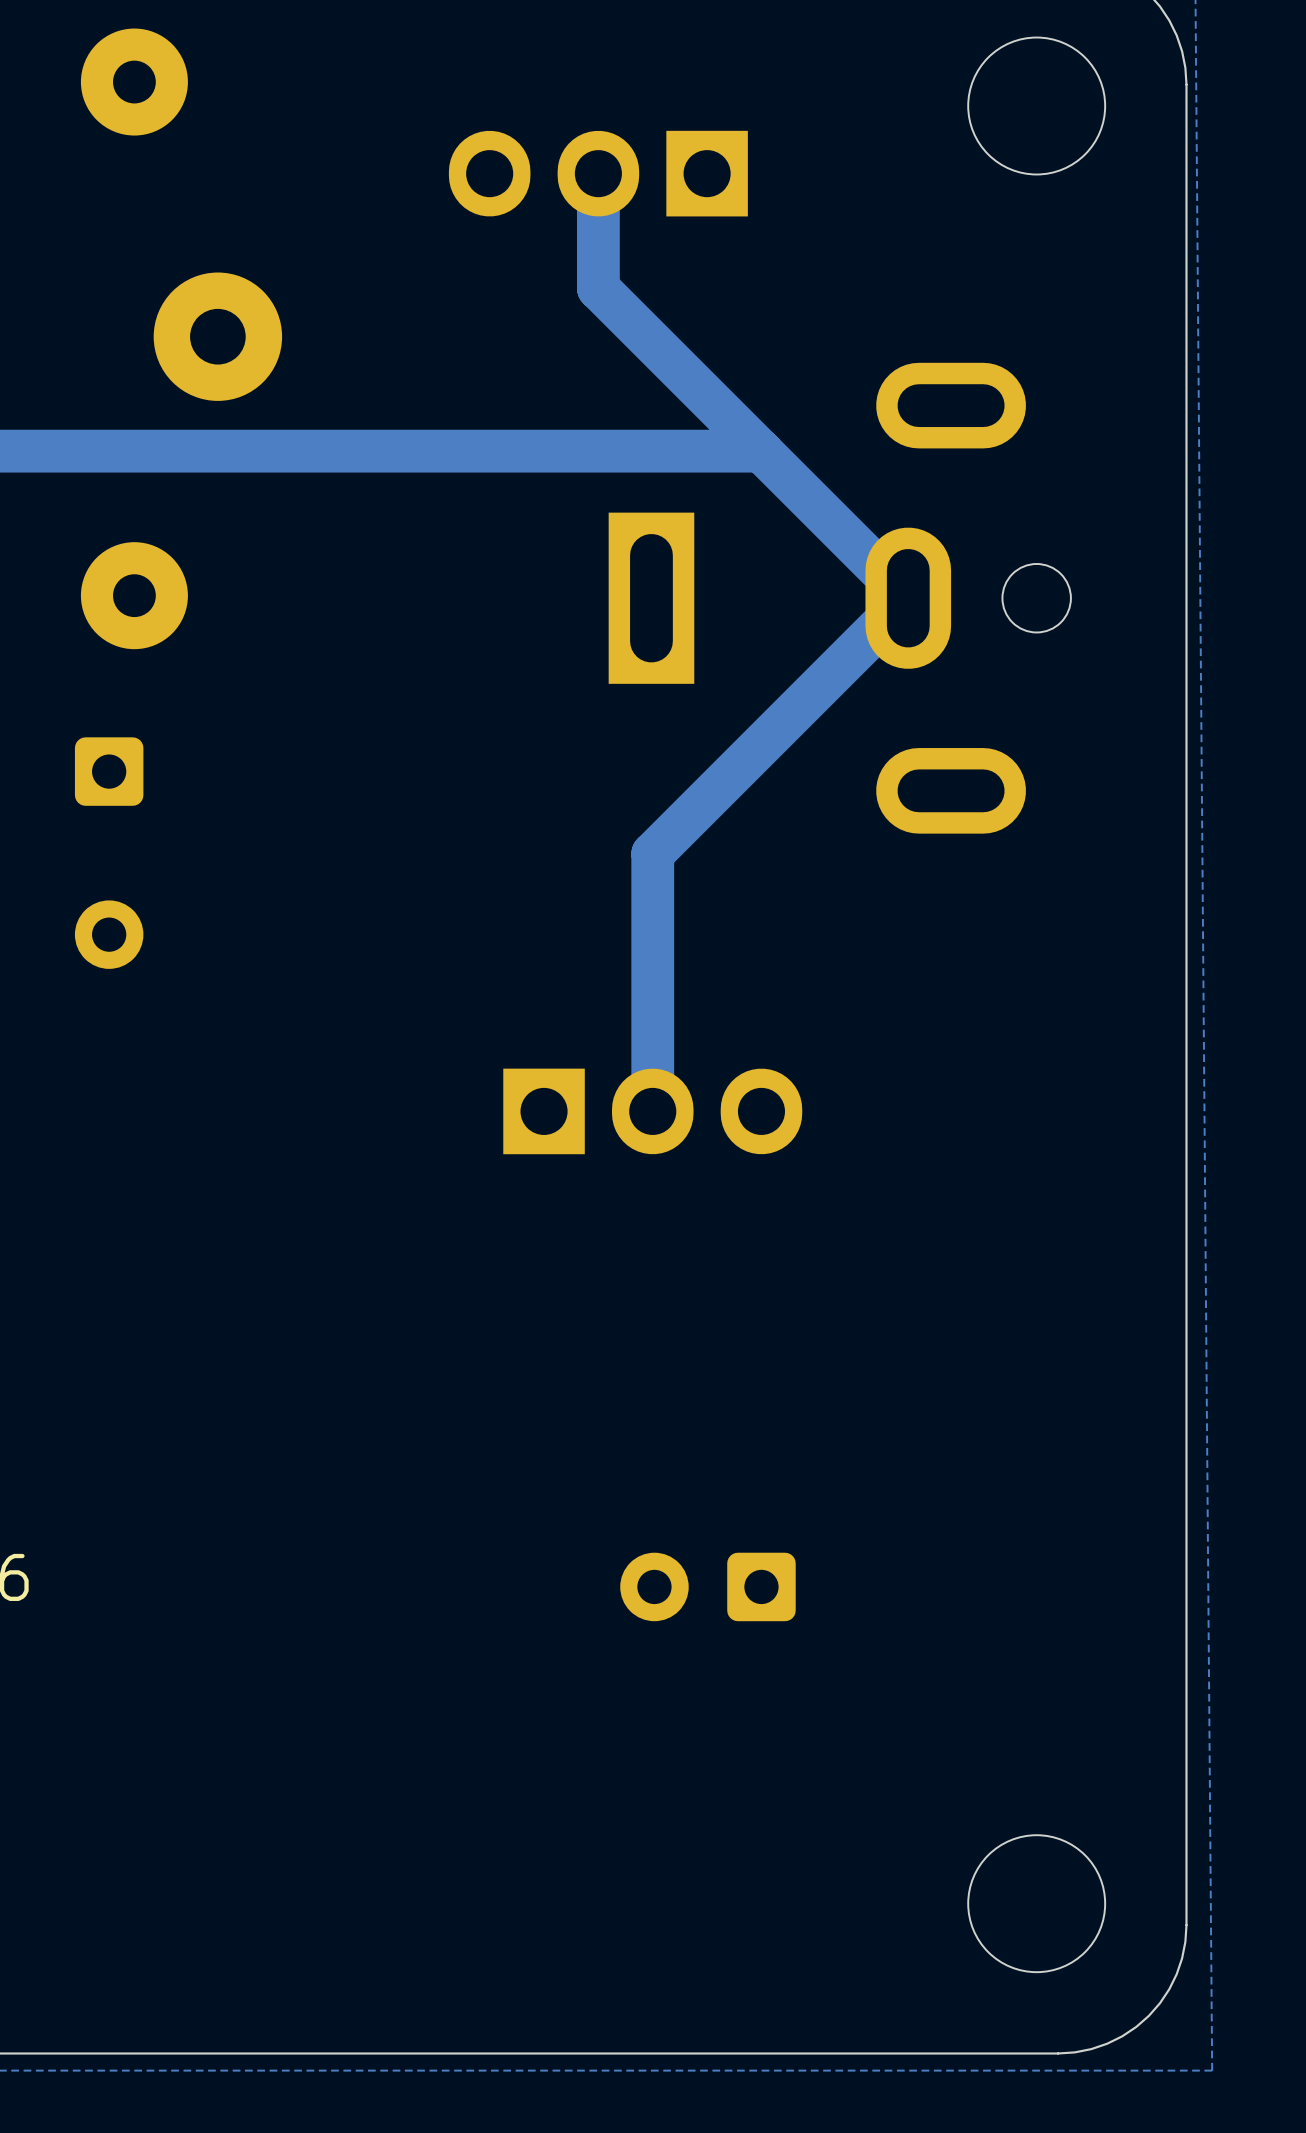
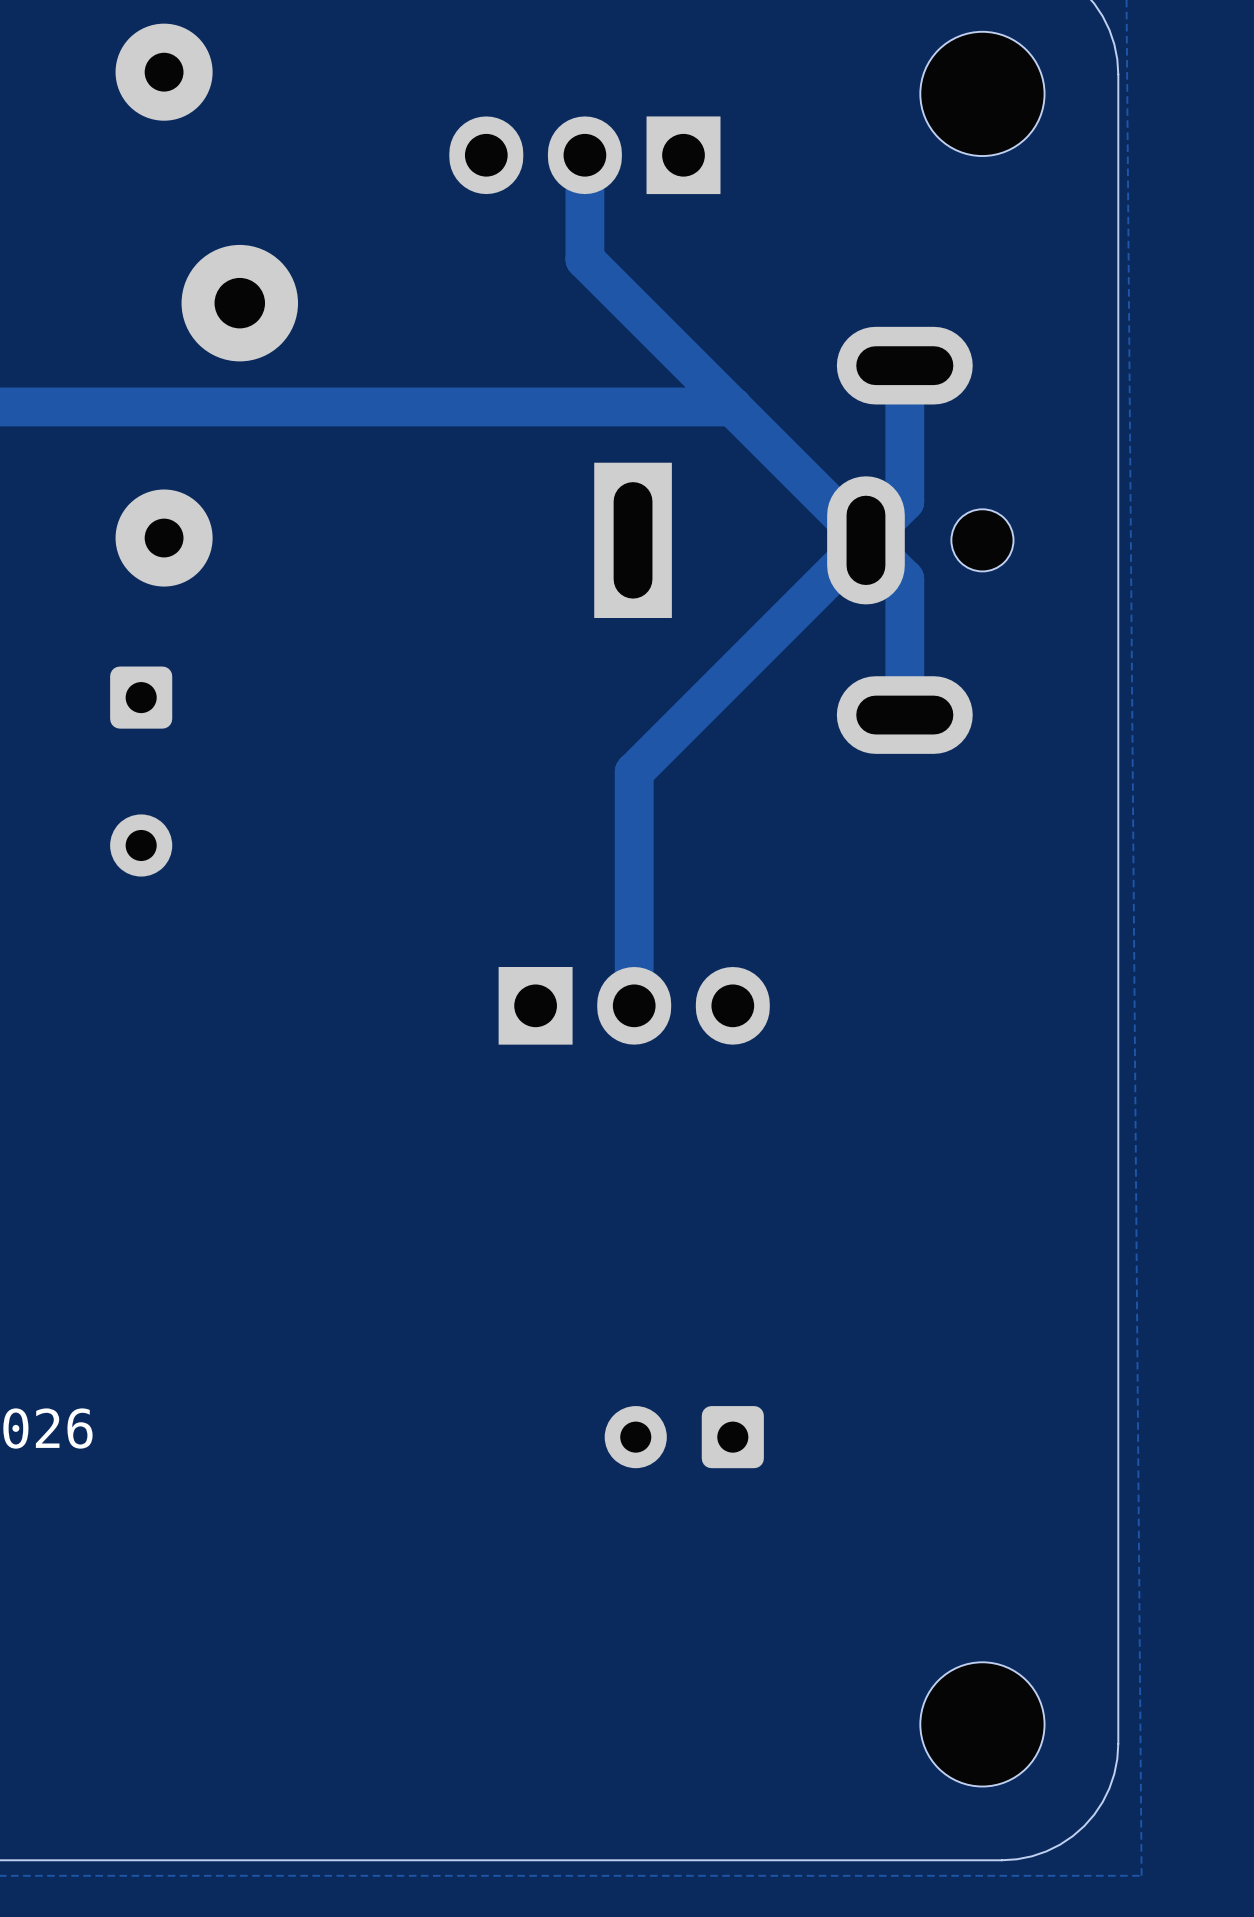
track: none -> (904, 365) (904, 501) (865, 540) (904, 579) (904, 715)

